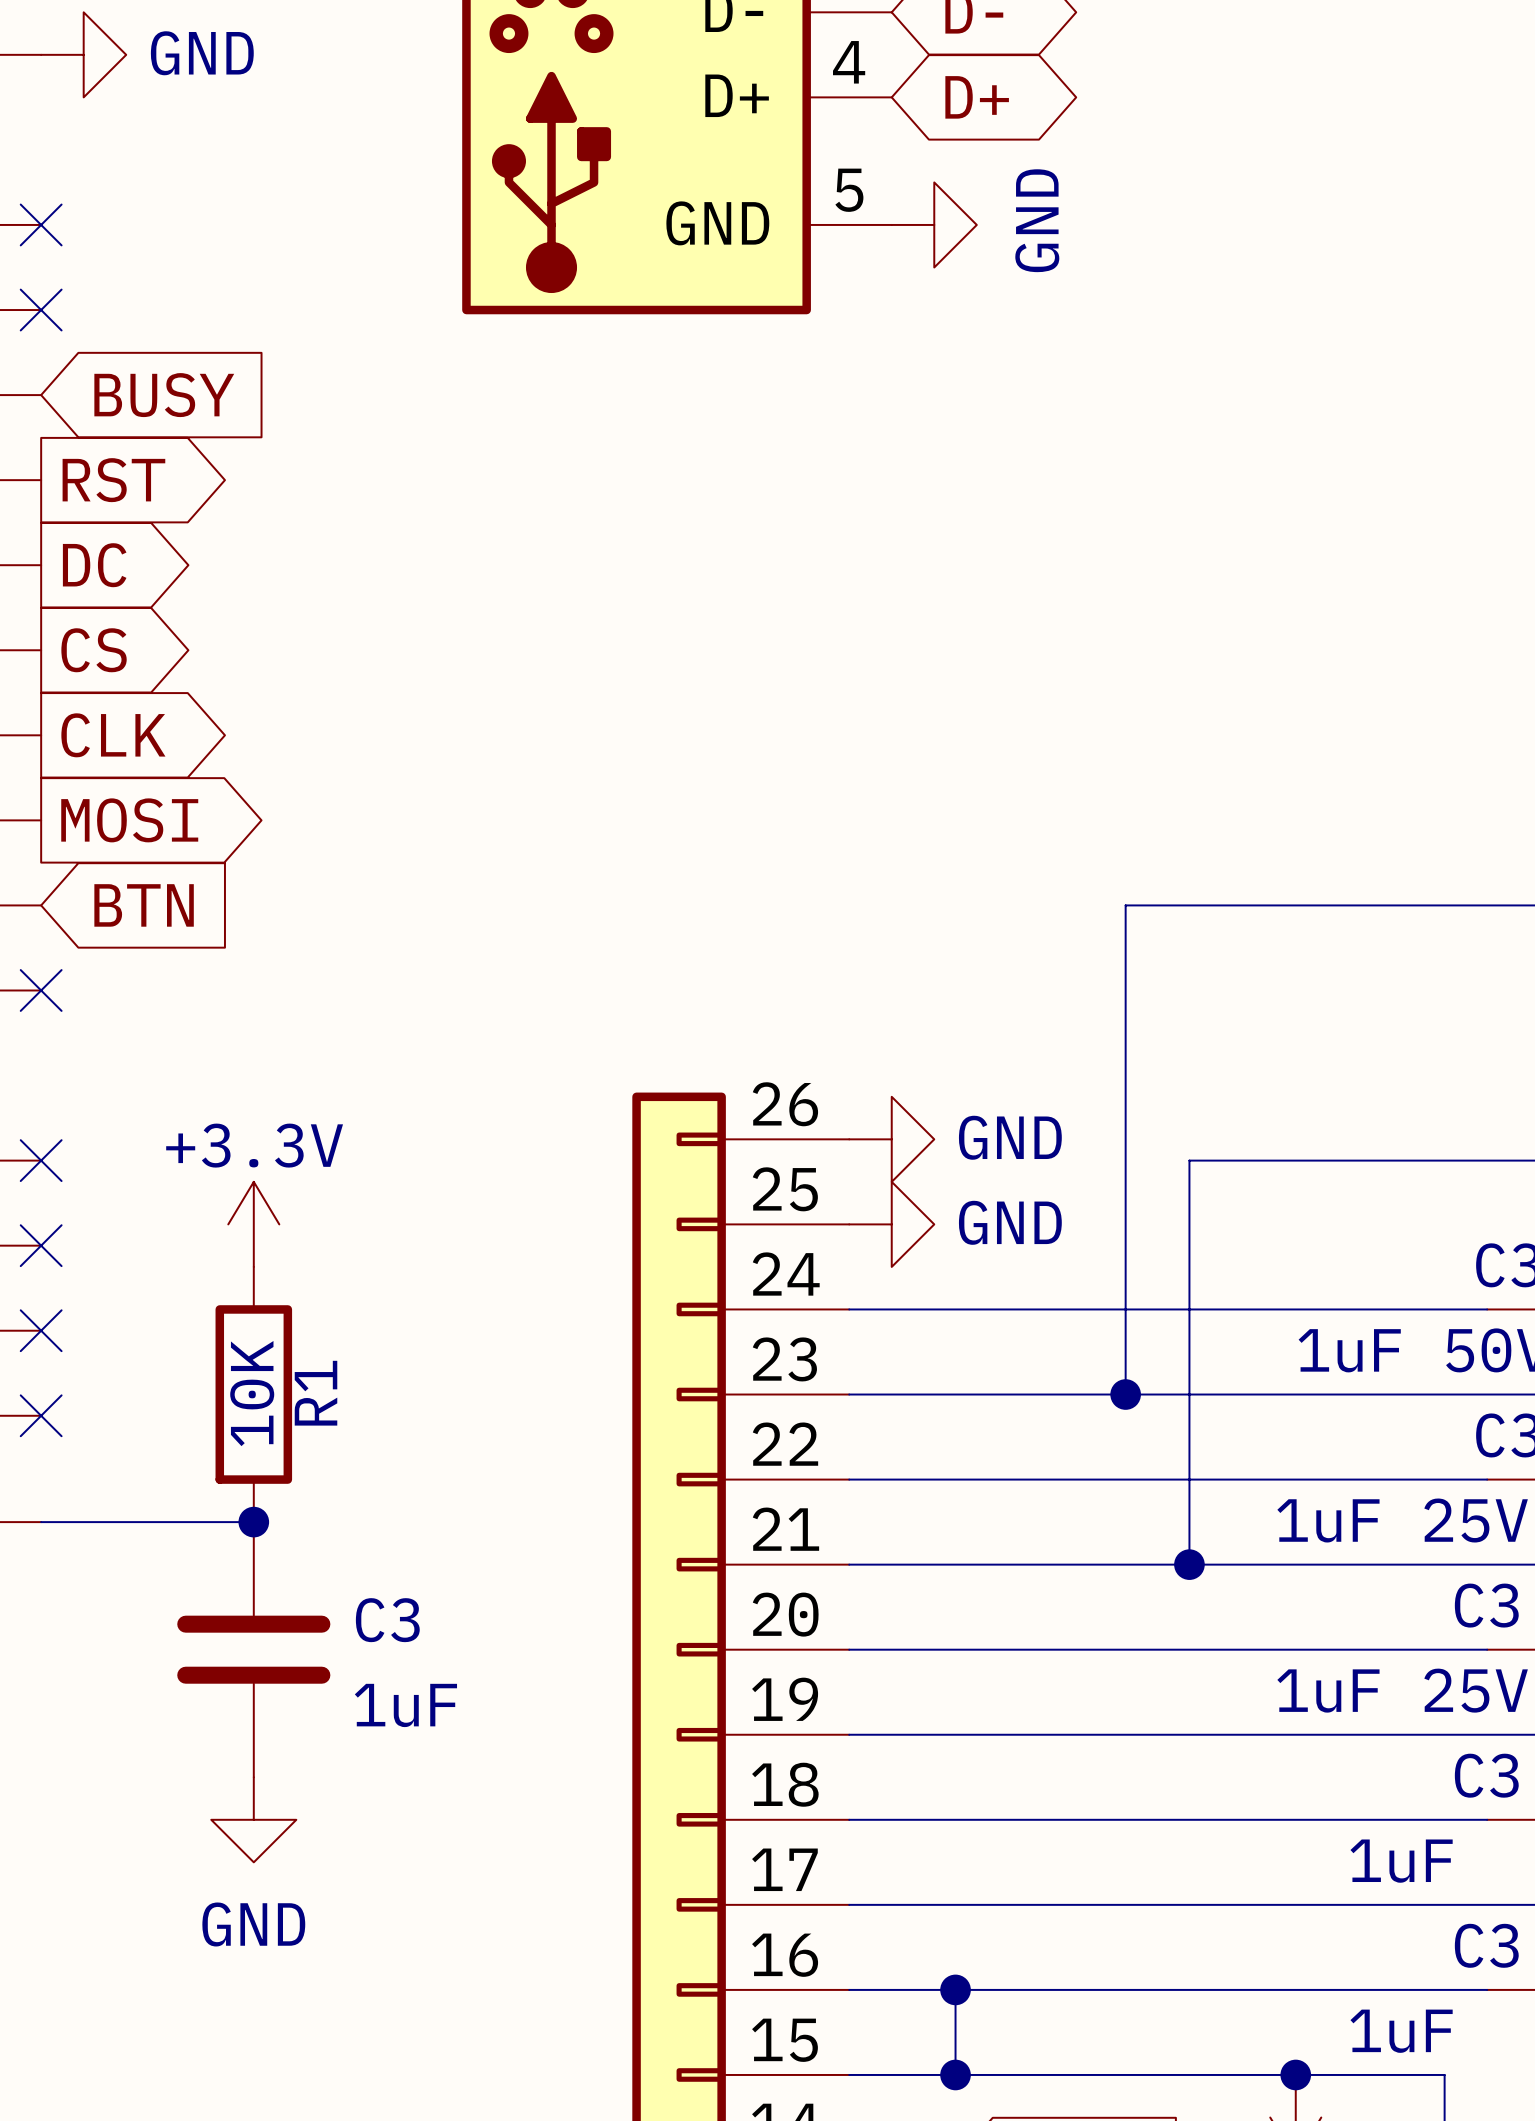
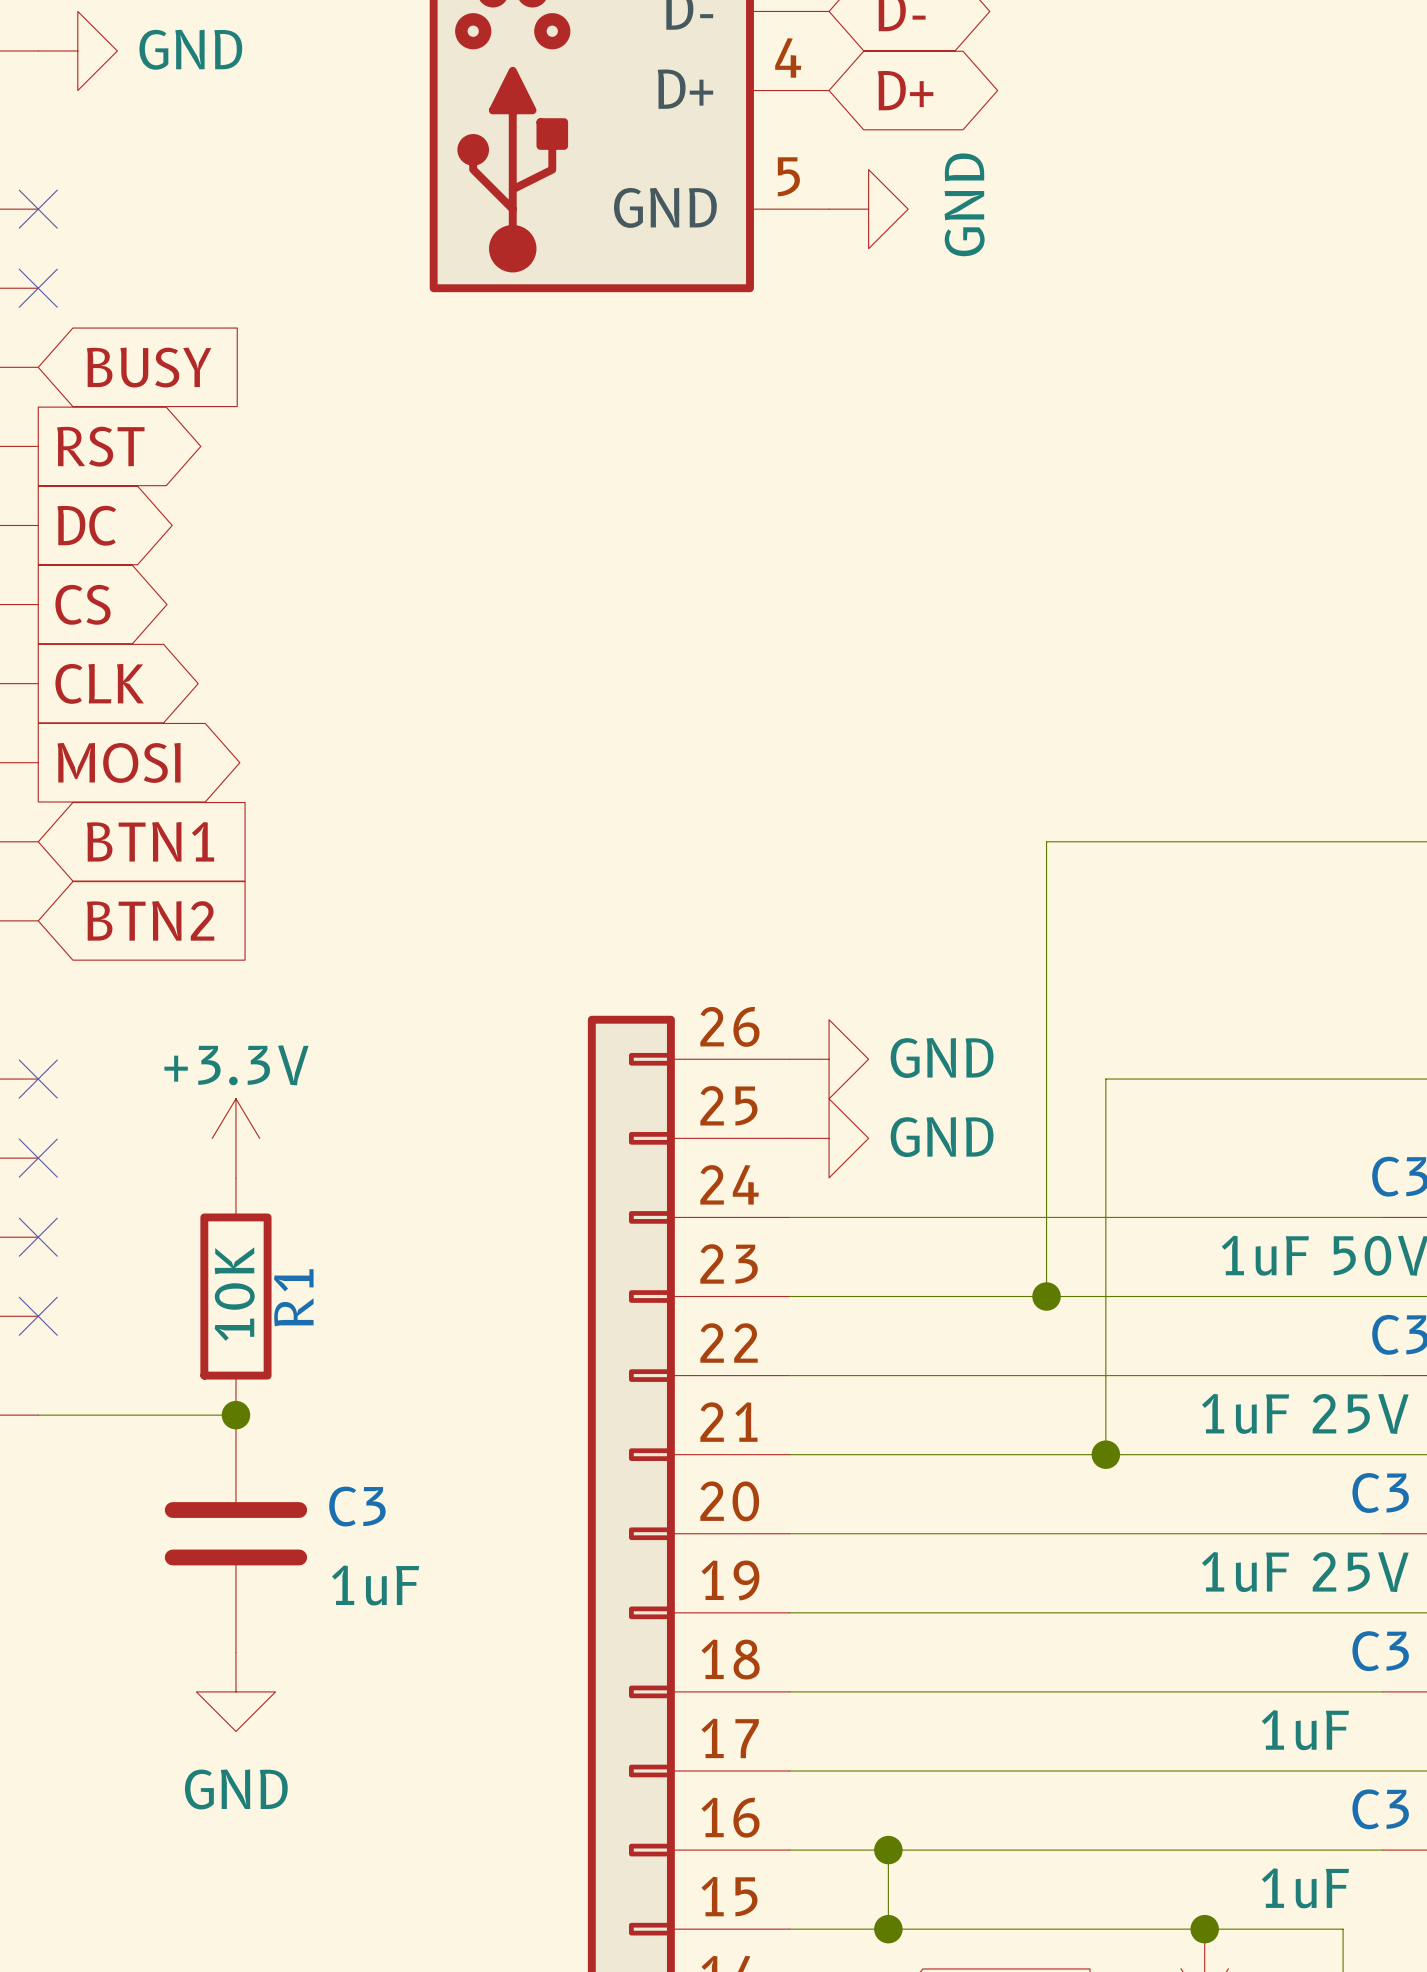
global label: BTN (144, 905) -> BTN1 (150, 841)
no-connect mark: (41, 990) -> none
global label: none -> BTN2 (150, 920)

